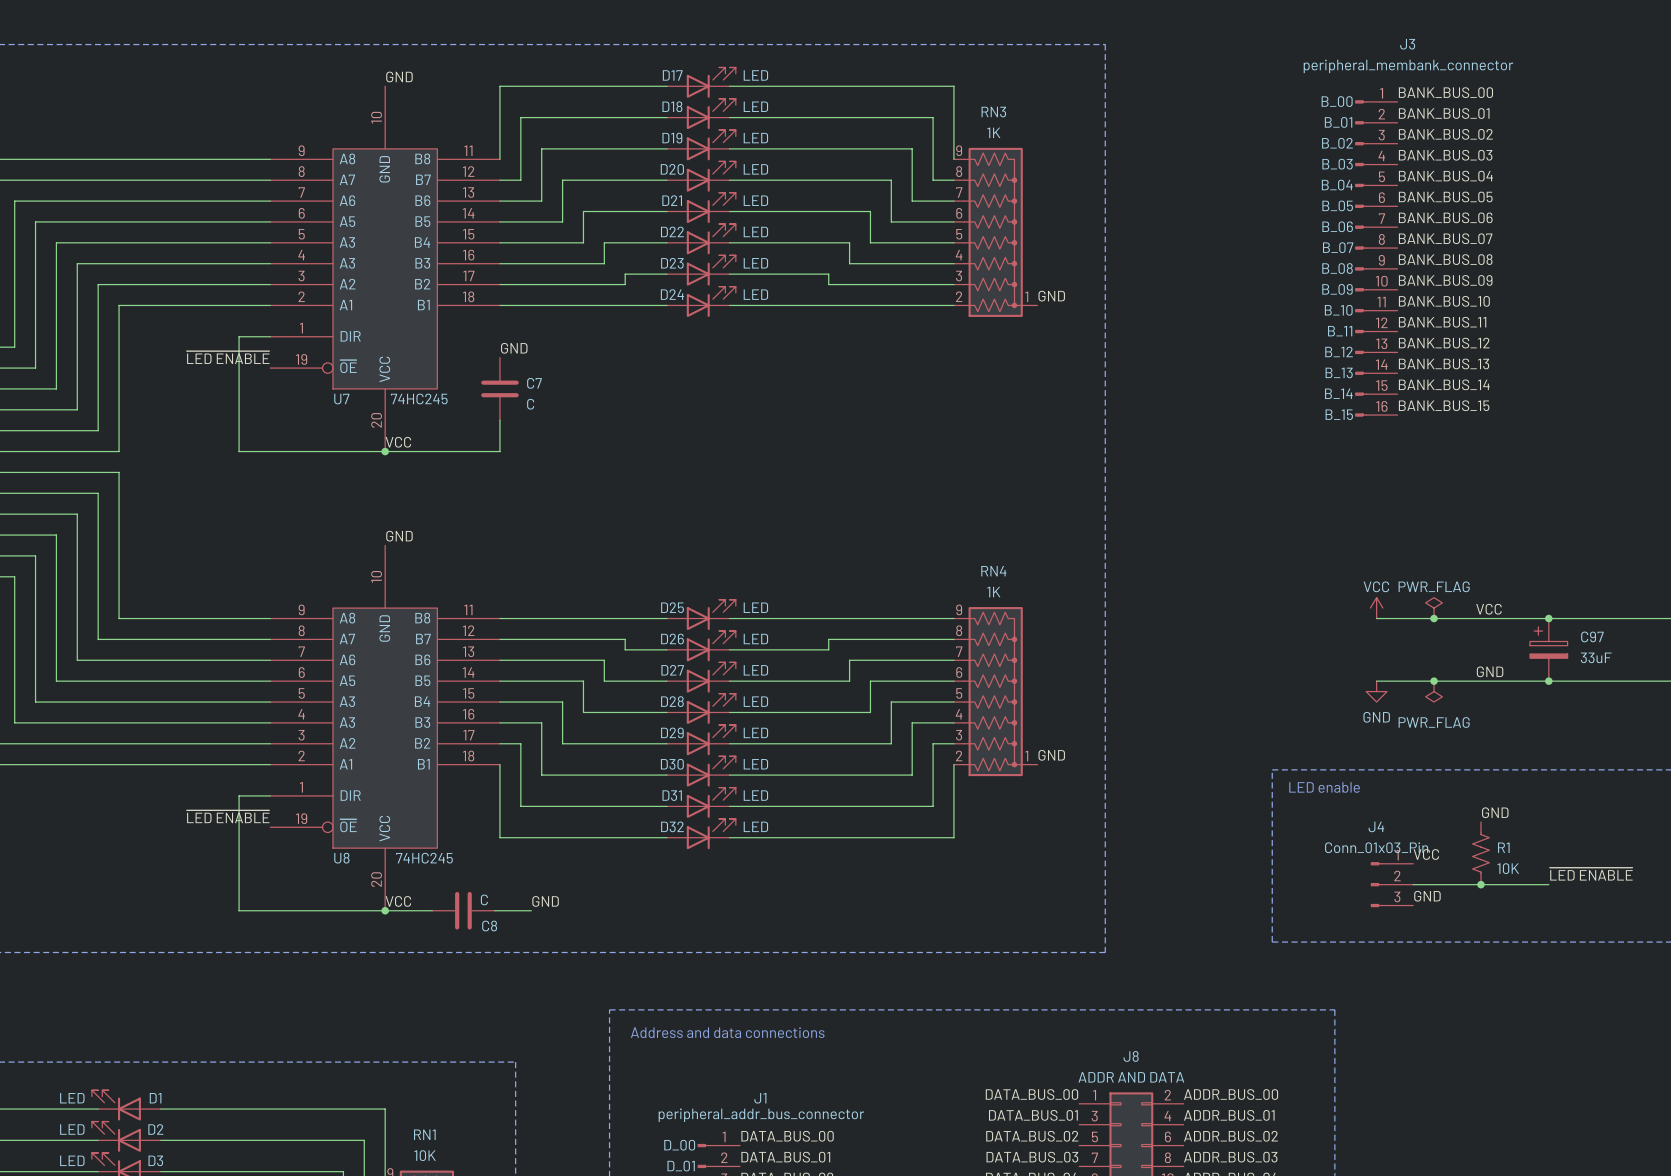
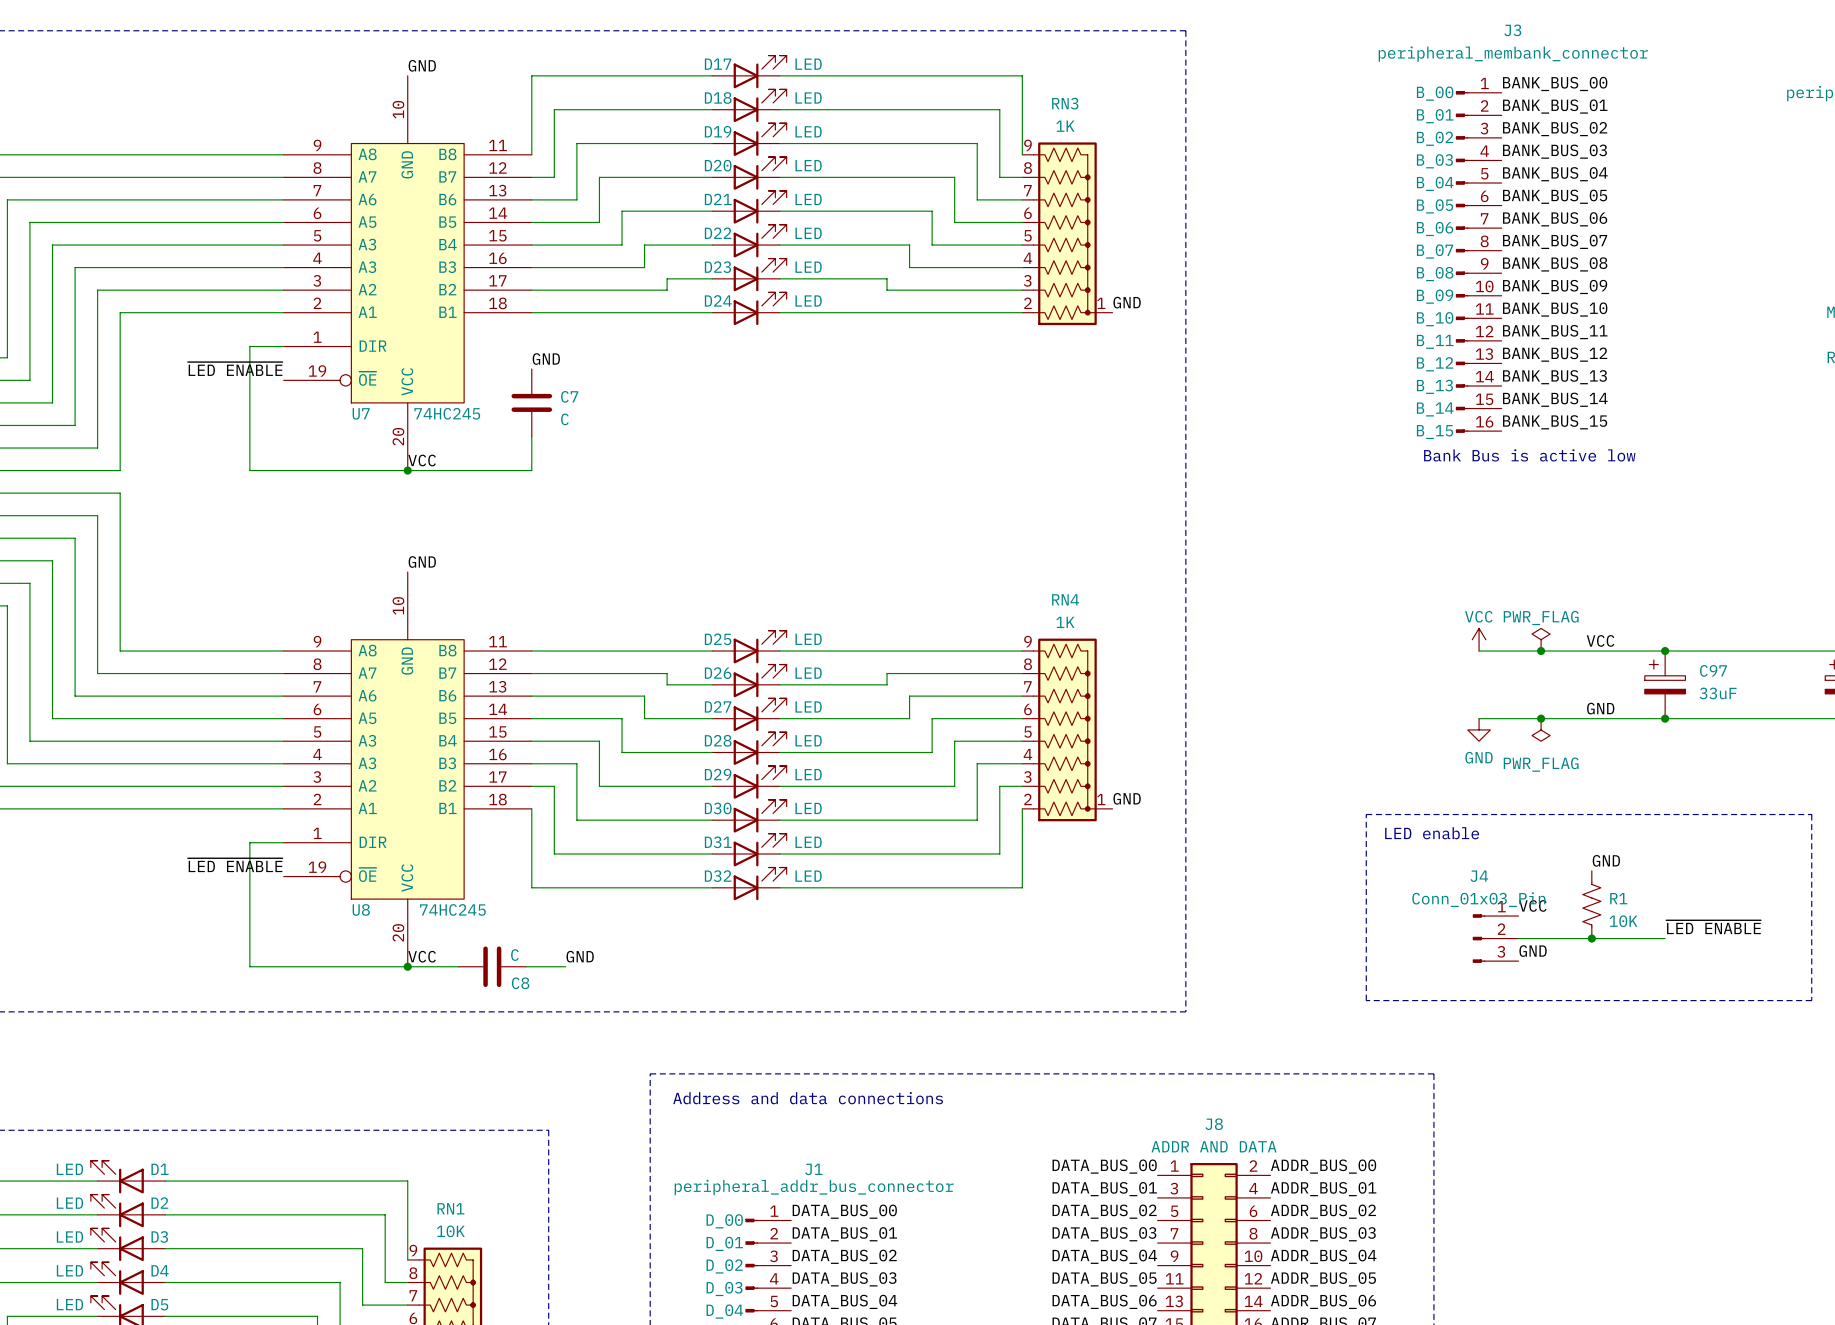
text: none -> Bank Bus is active low (1529, 455)

